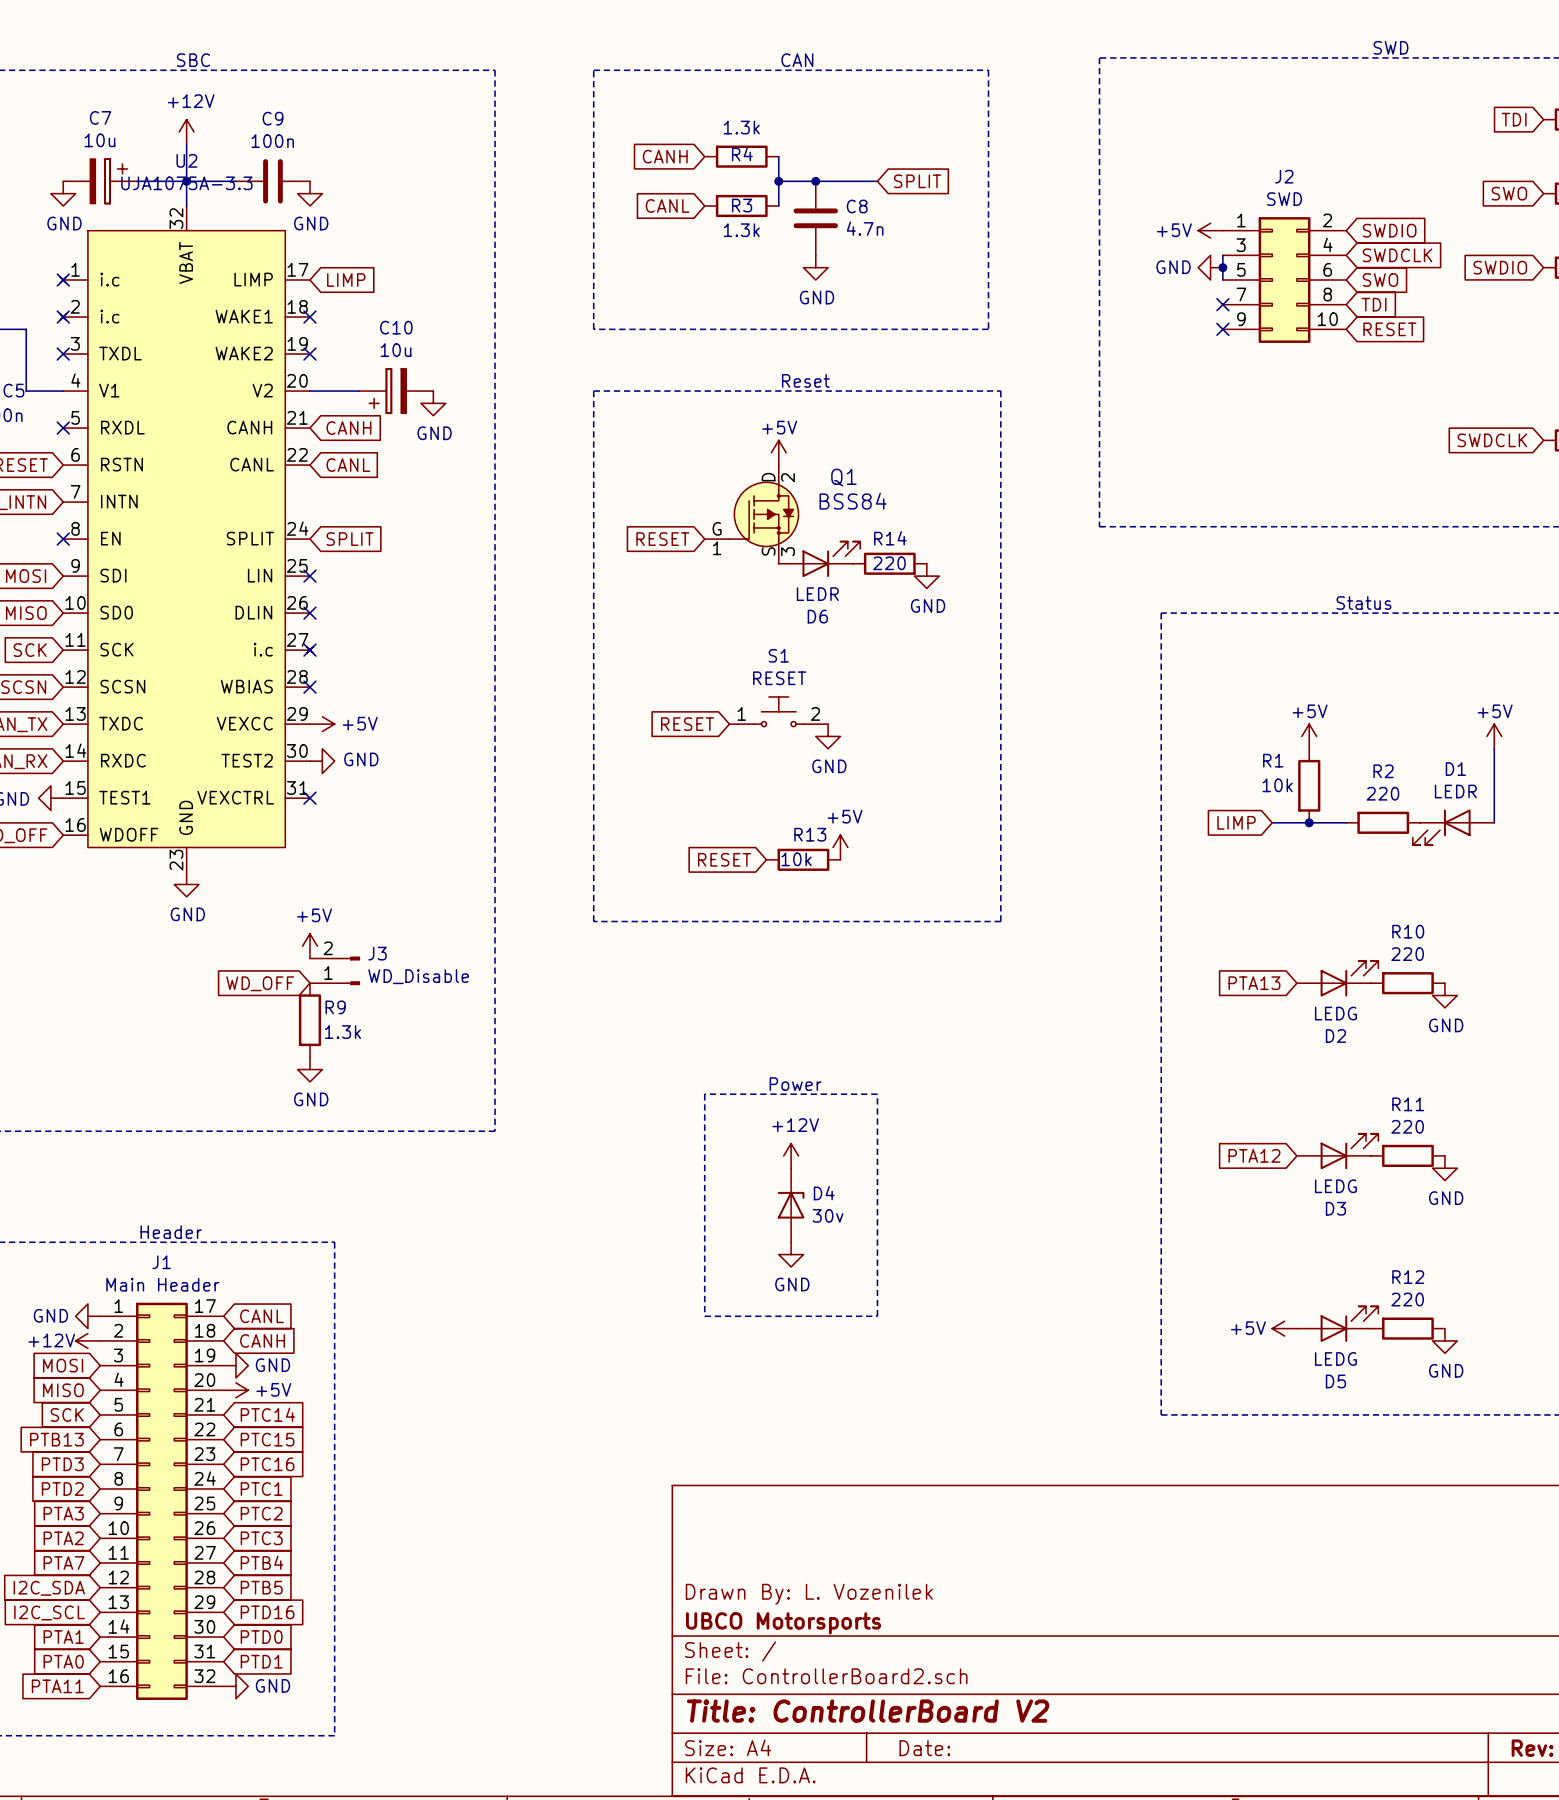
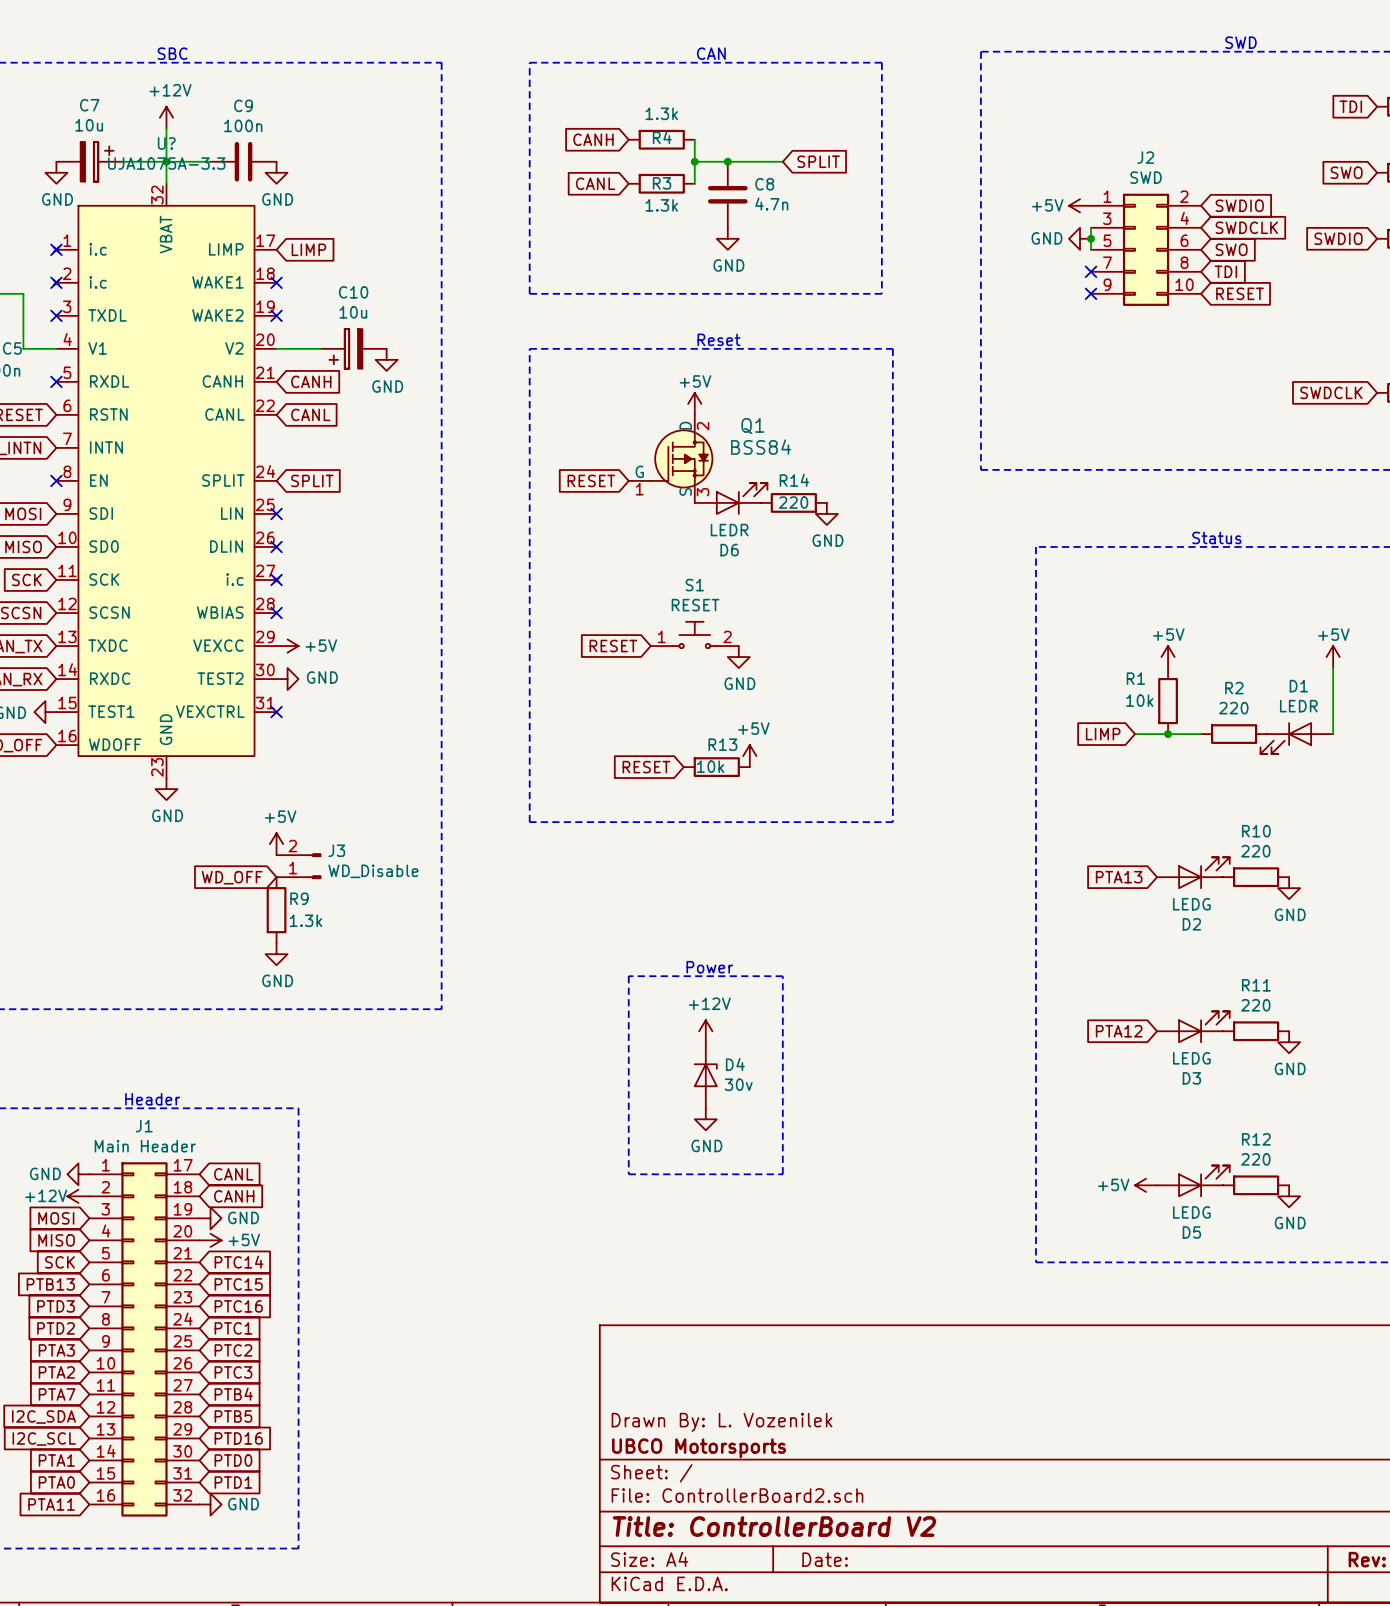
U2 name: U2 (186, 160) -> U? (166, 143)

